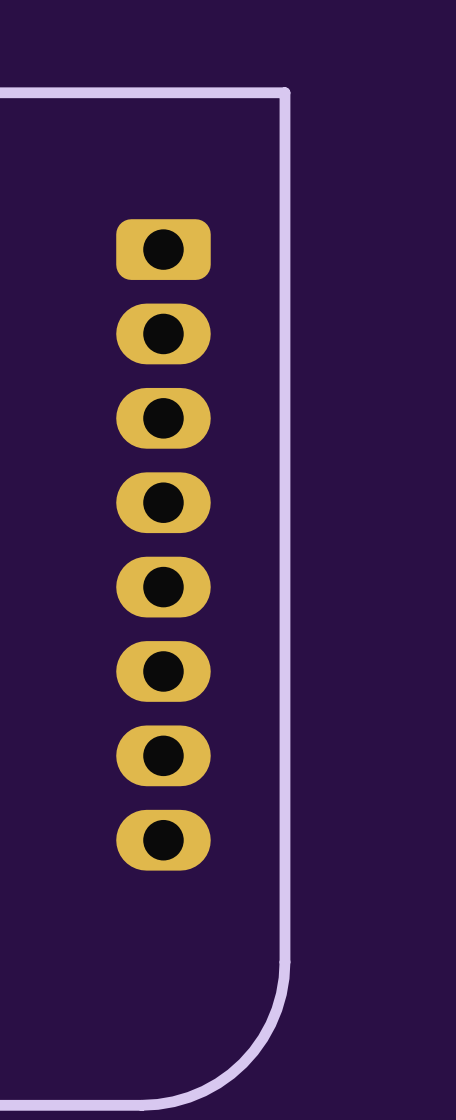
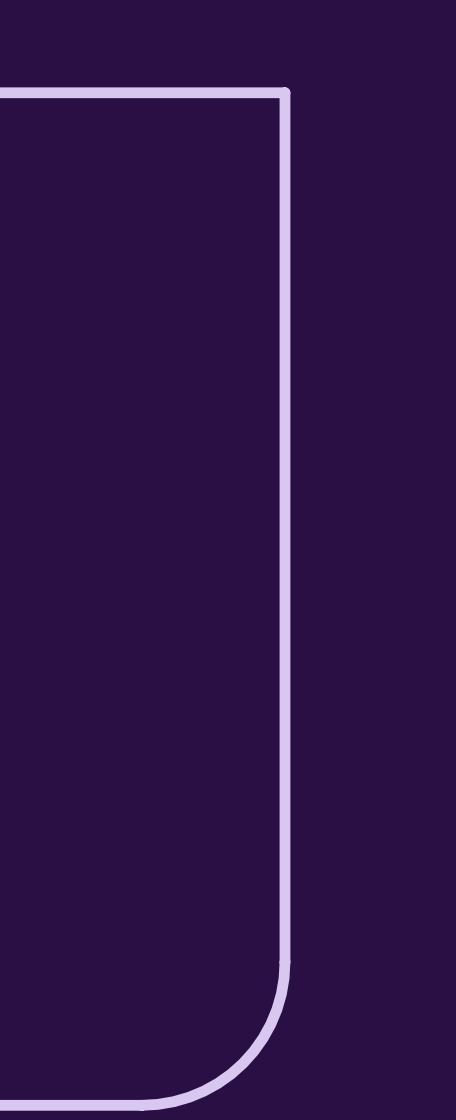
part: (163, 544) -> none

